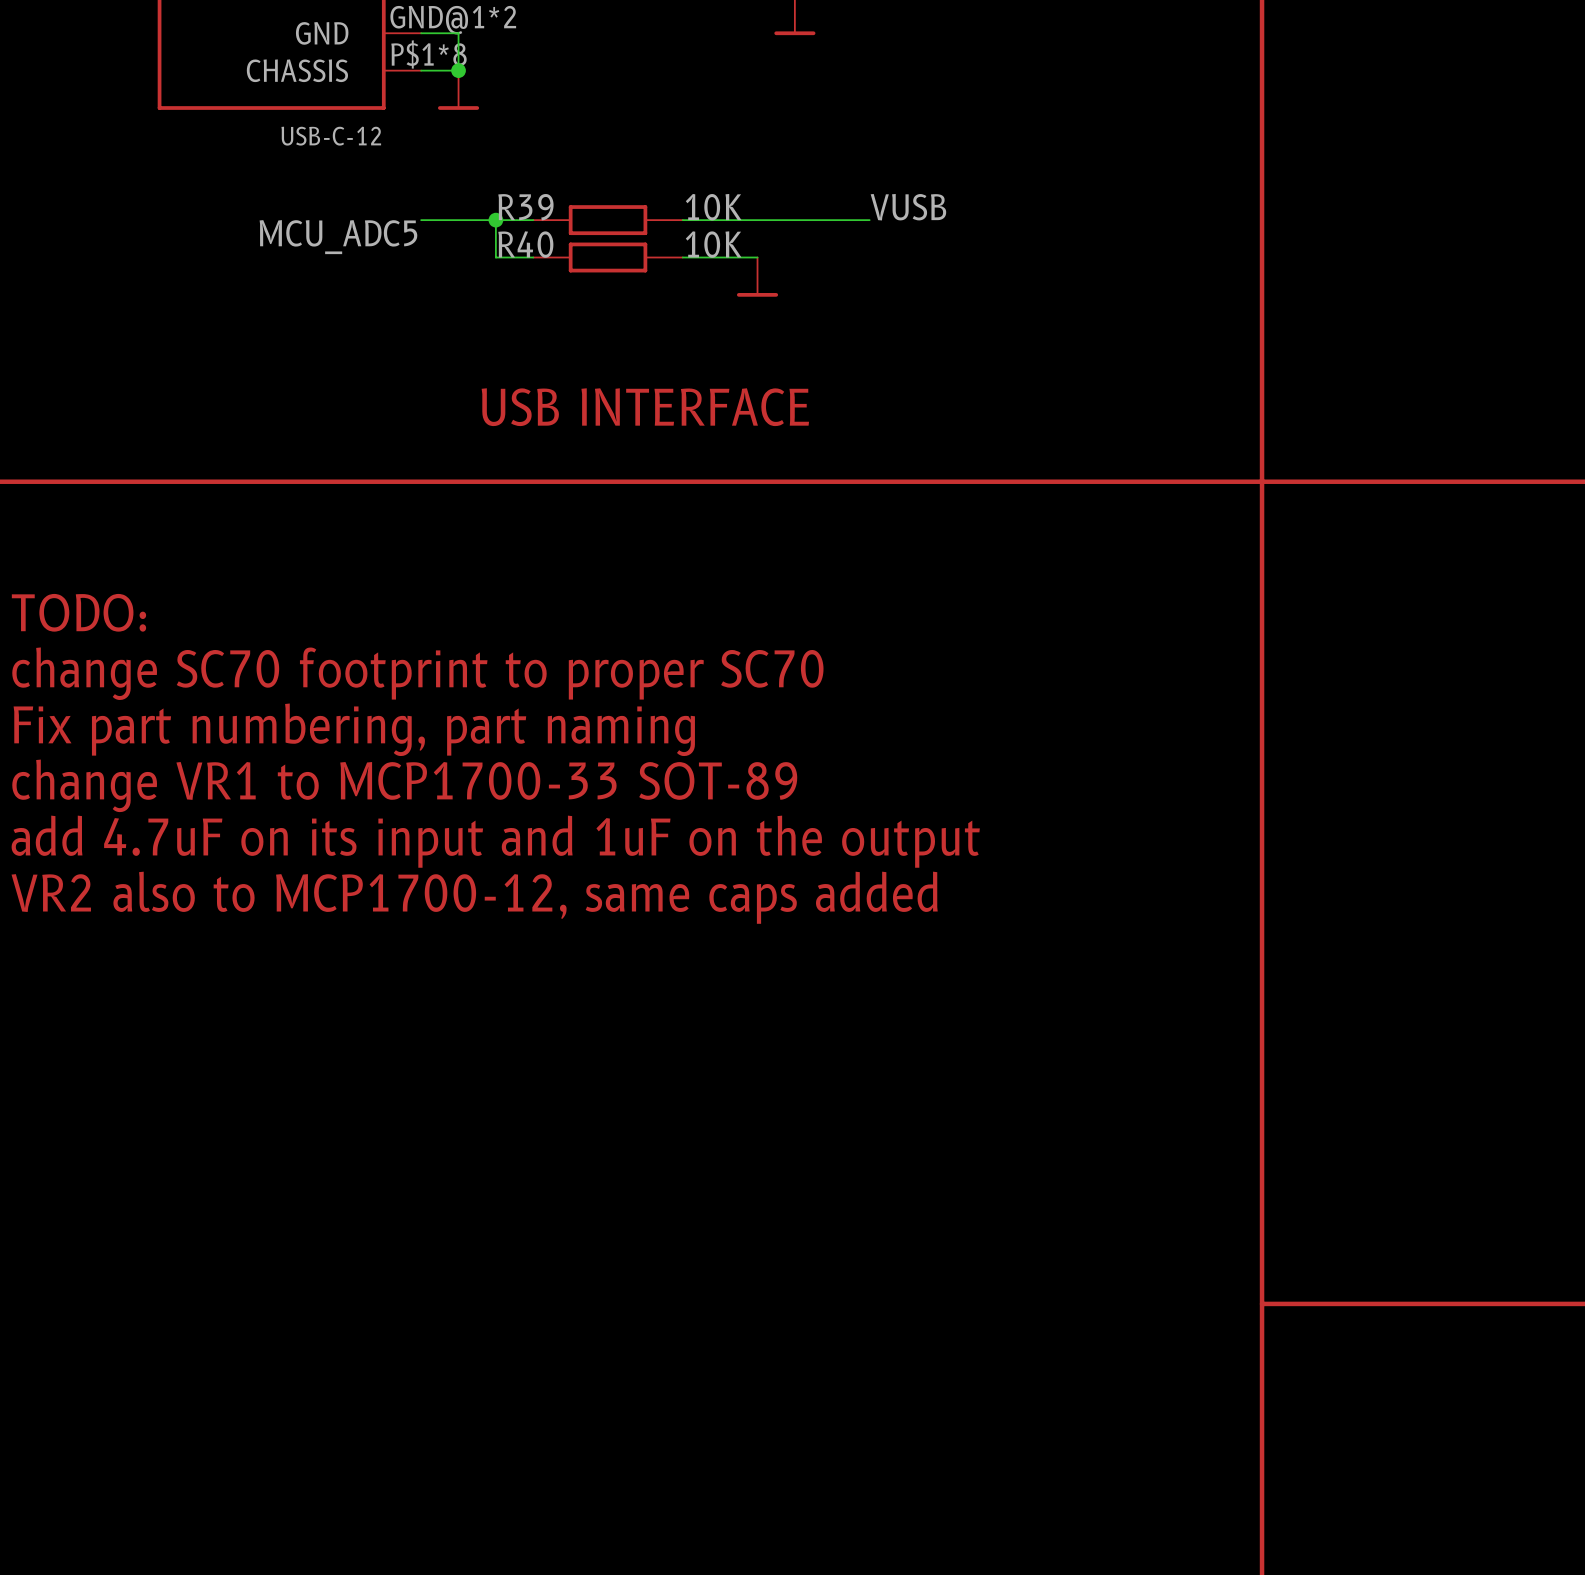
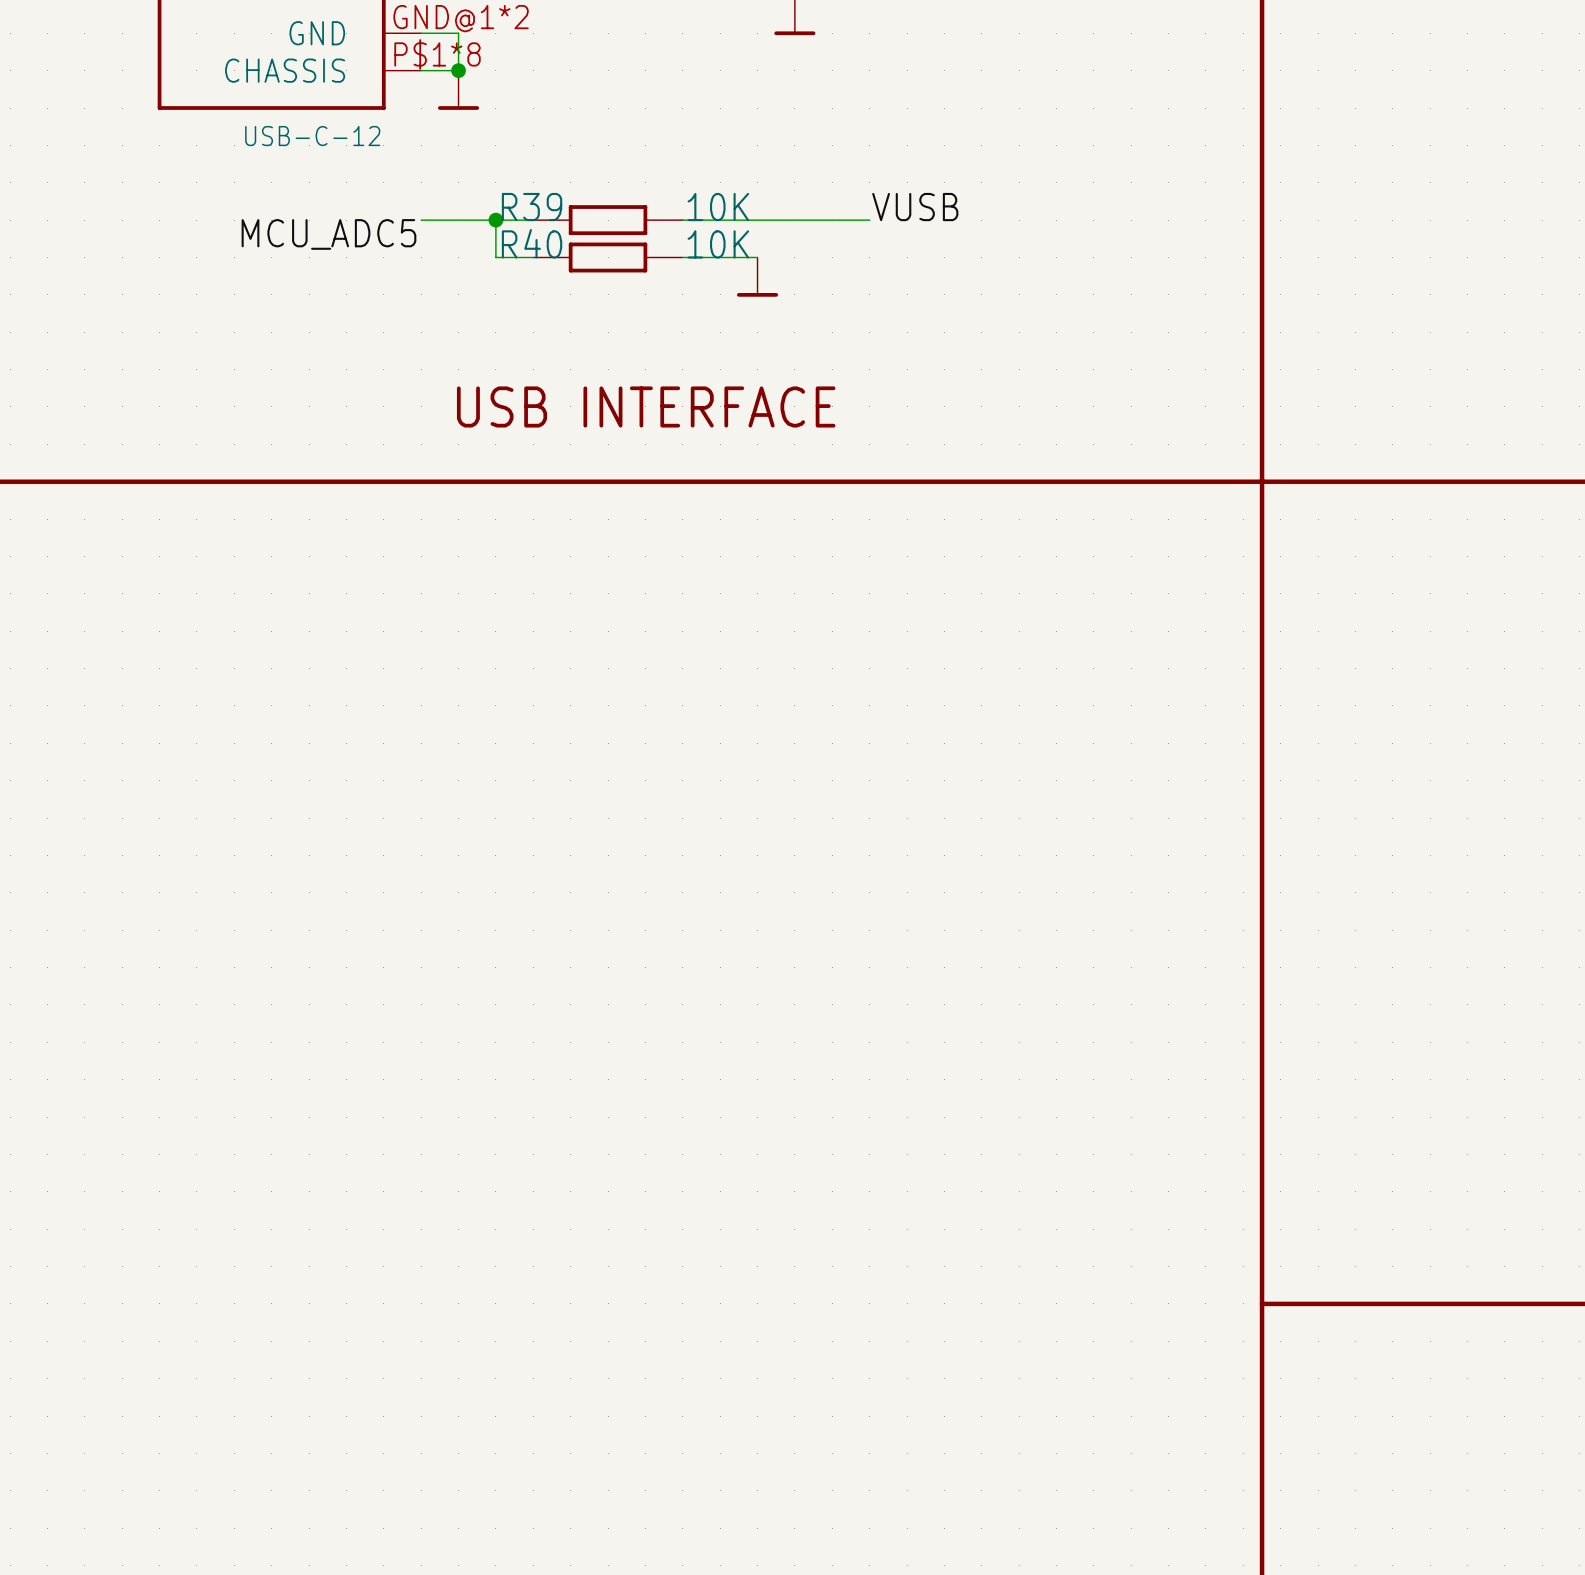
text: TODO: (78, 612) -> none
text: change SC70 footprint to proper SC70 (417, 673) -> none
text: Fix part numbering, part naming (354, 729) -> none
text: change VR1 to MCP1700-33 SOT-89 (404, 785) -> none
text: add 4.7uF on its input and 1uF on the output (495, 841) -> none
text: VR2 also to MCP1700-12, same caps added (474, 897) -> none

